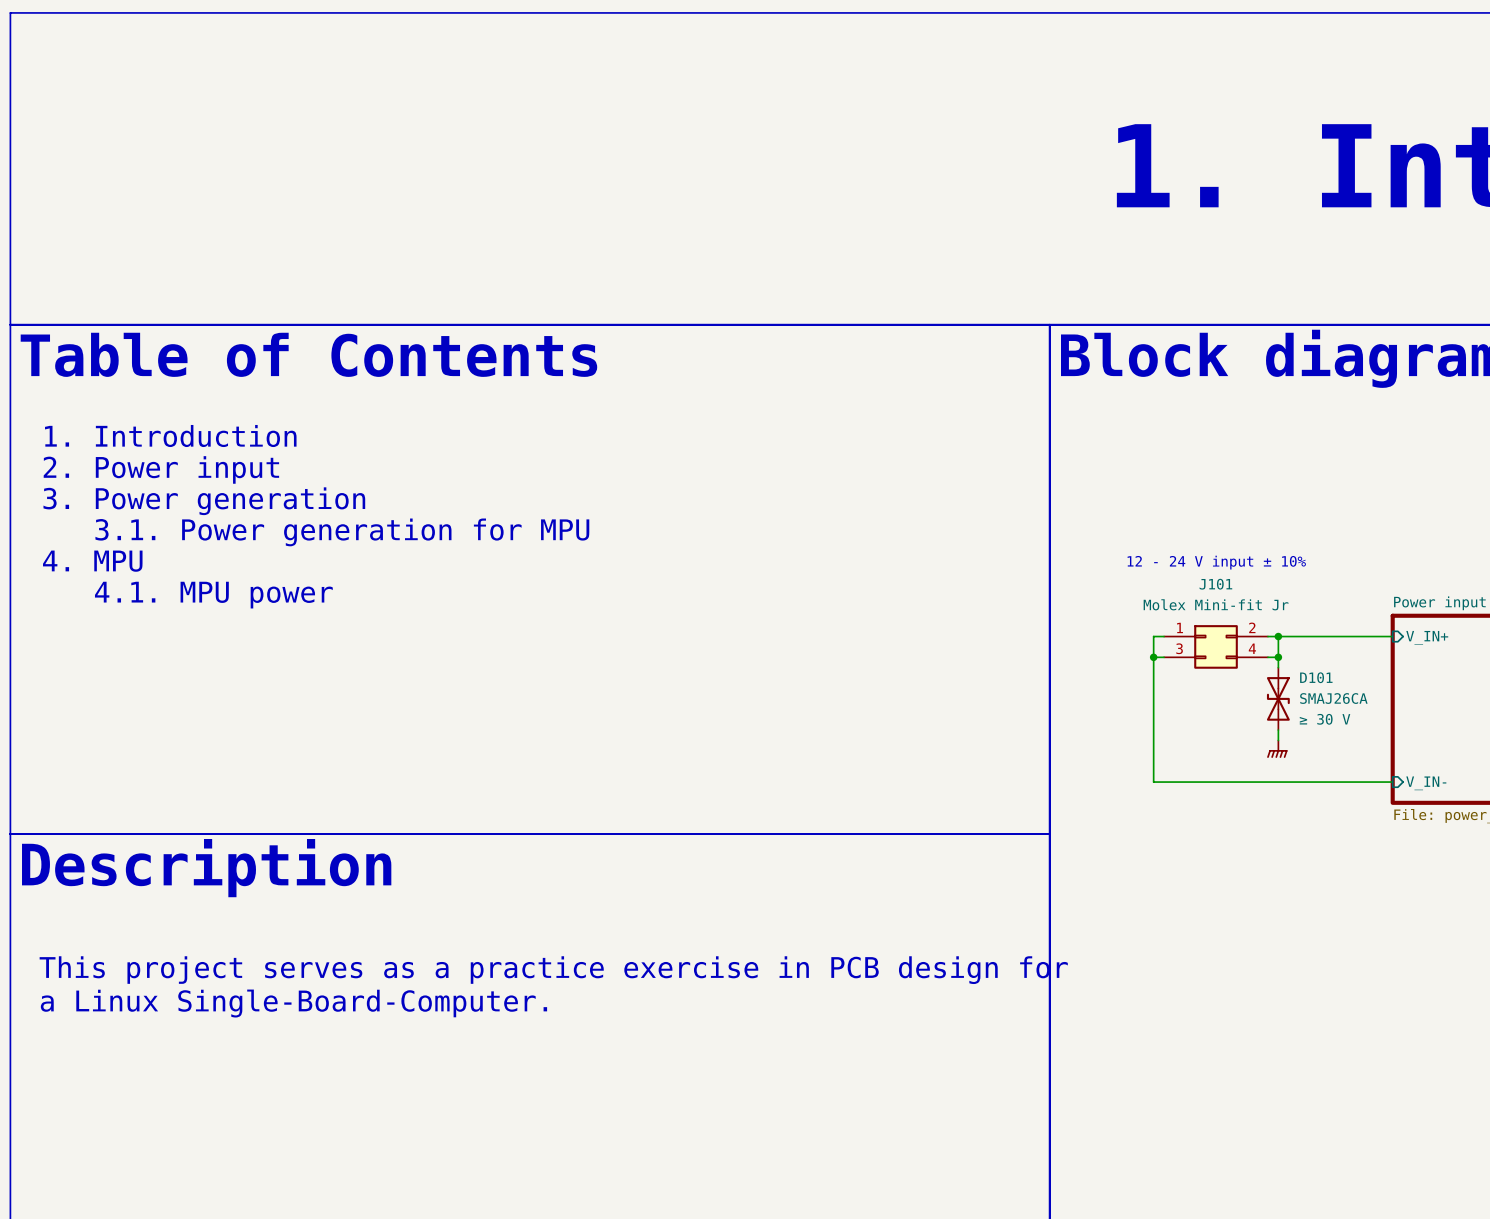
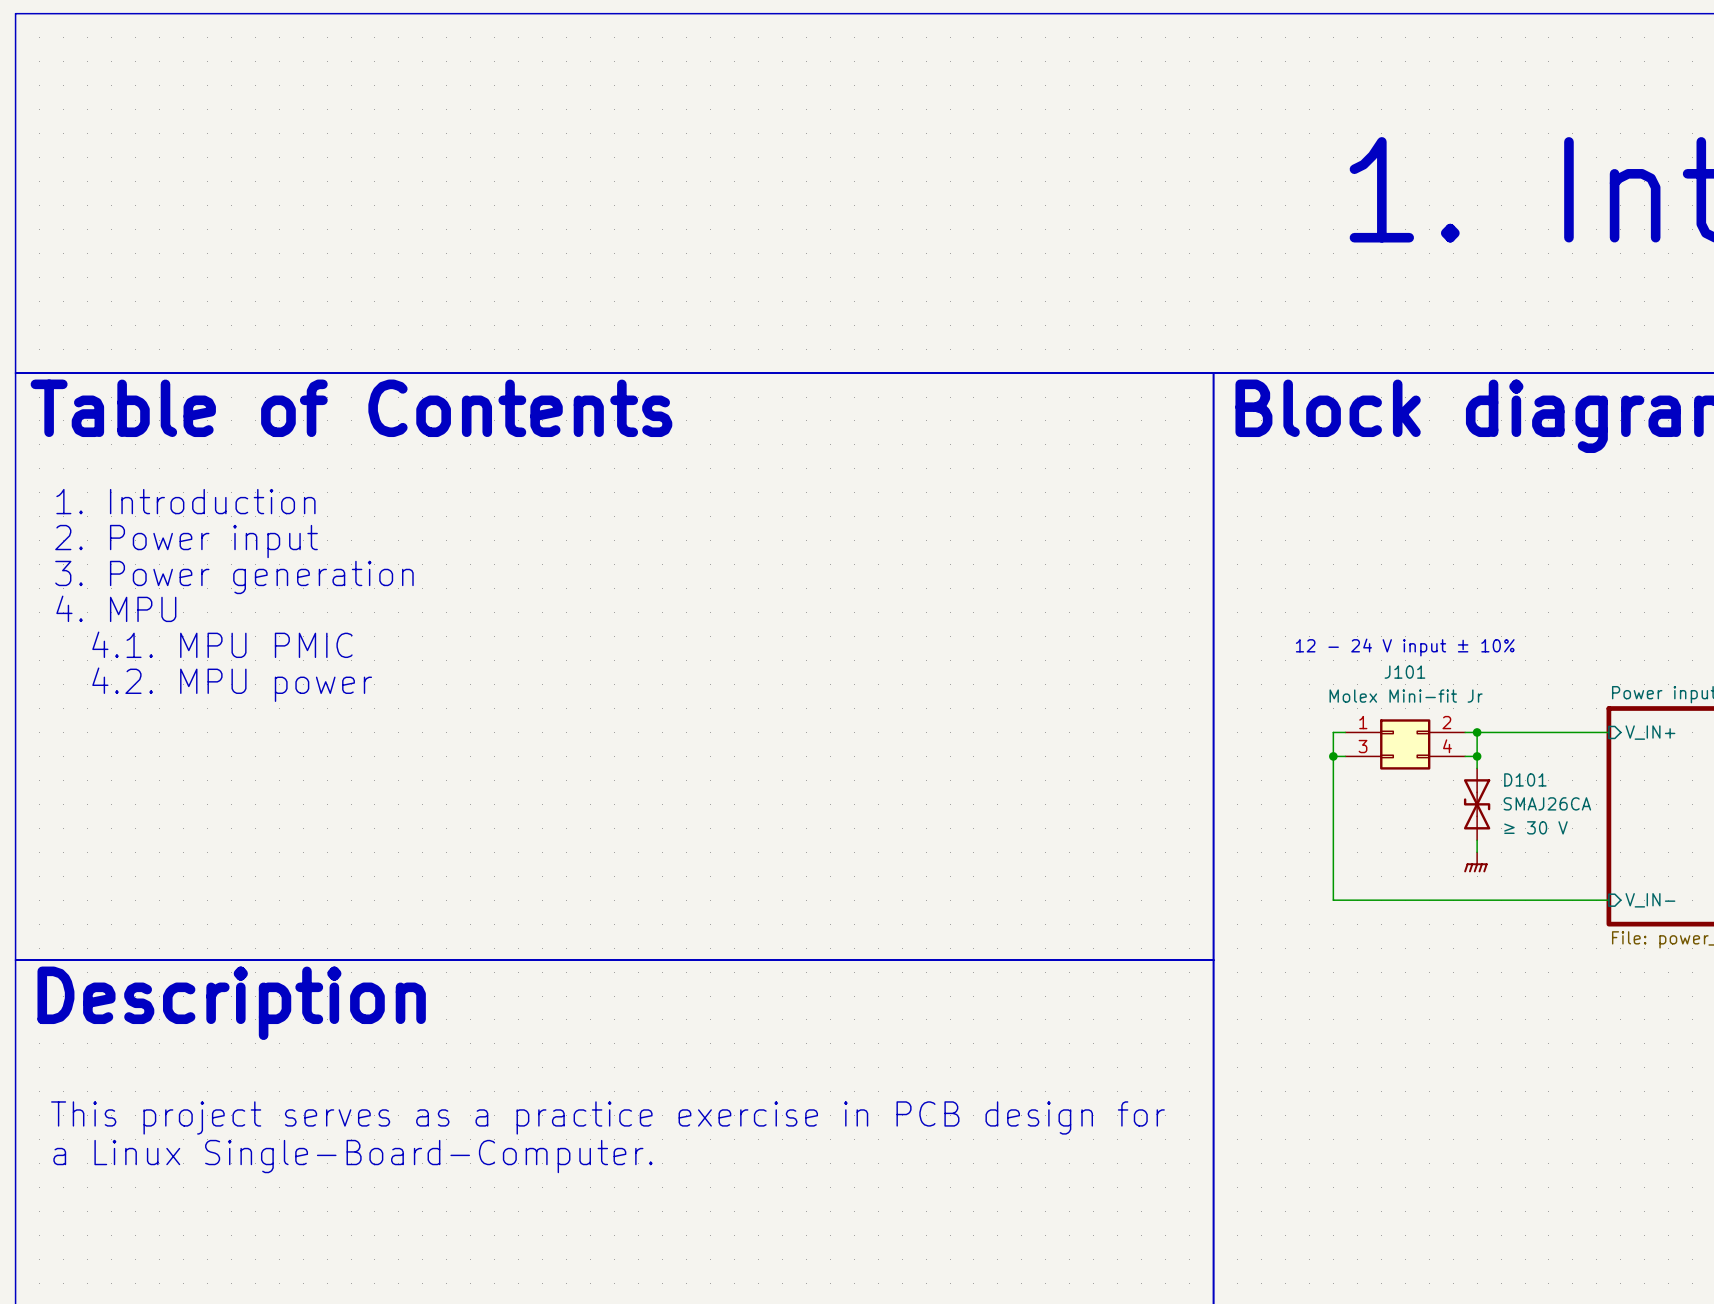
text: 3.1. Power generation for MPU (342, 532) -> none
text: none -> 4.1. MPU PMIC (222, 644)
text position: 4. MPU (92, 561) -> 4. MPU (116, 608)
text: none -> 4.2. MPU power (232, 684)
text: 4.1. MPU power (213, 595) -> none

